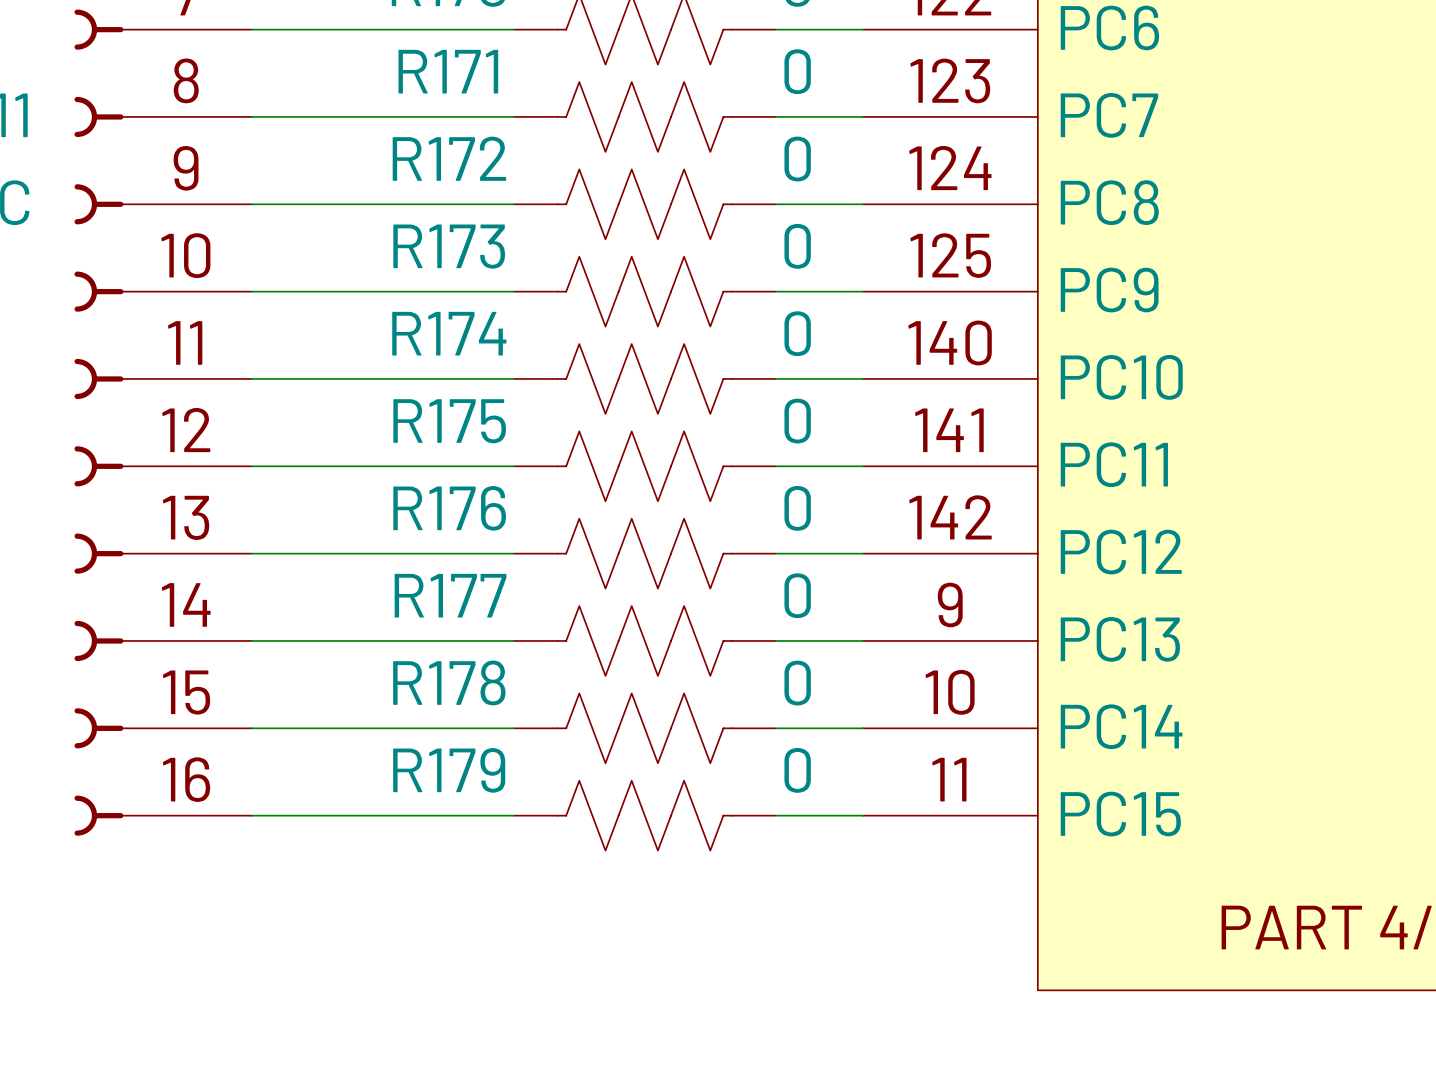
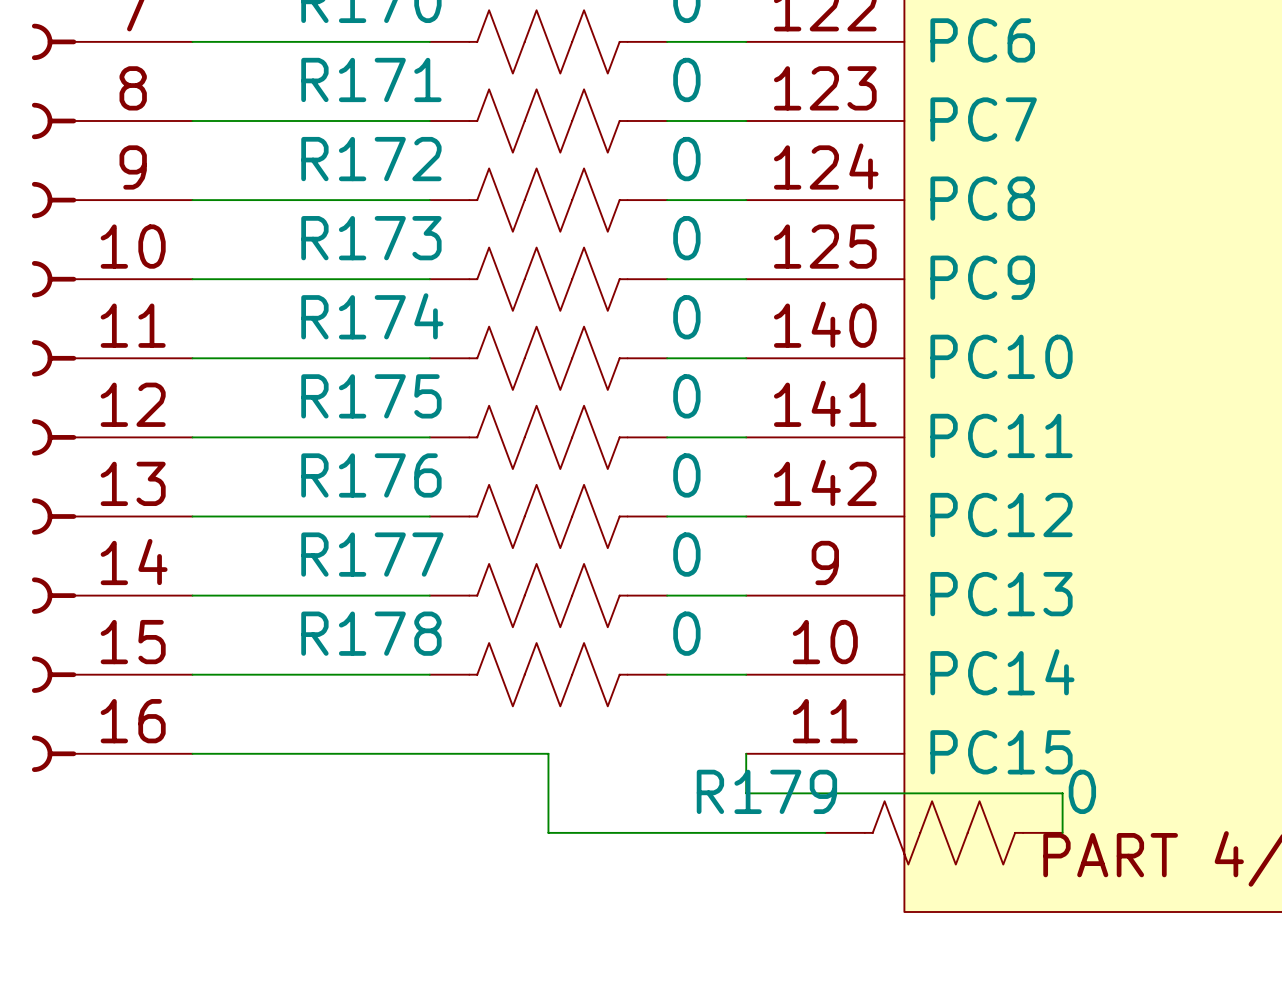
wire: none -> (429, 753) (548, 753) (548, 832) (825, 832)
R179 position: (644, 815) -> (943, 832)
wire: (775, 815) (863, 815) -> (1062, 832) (1062, 793) (746, 793) (746, 753)

